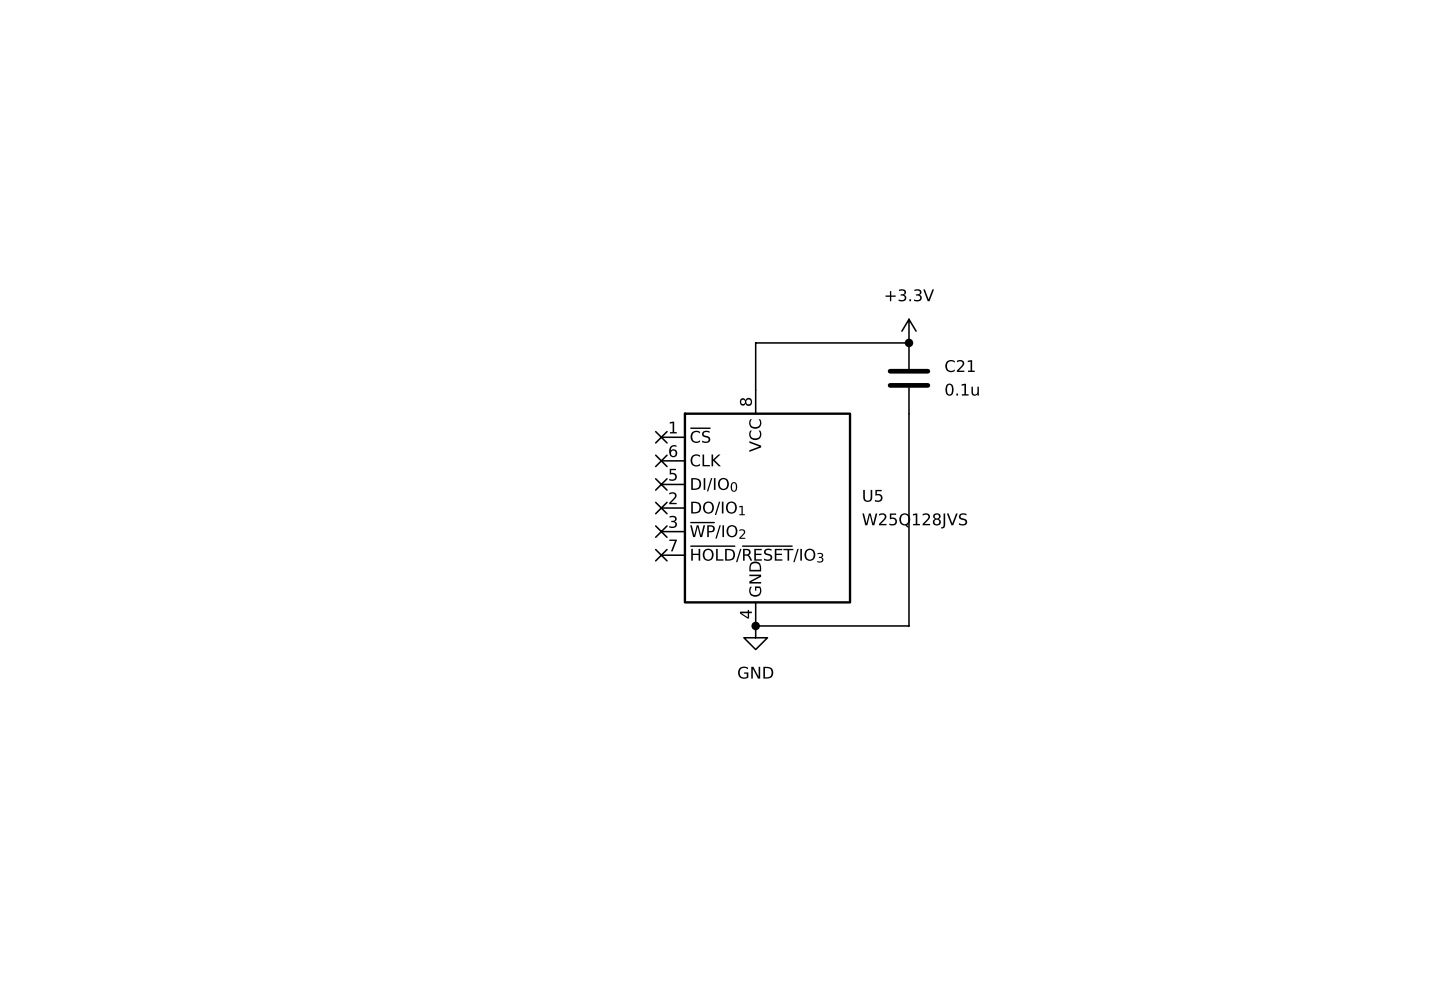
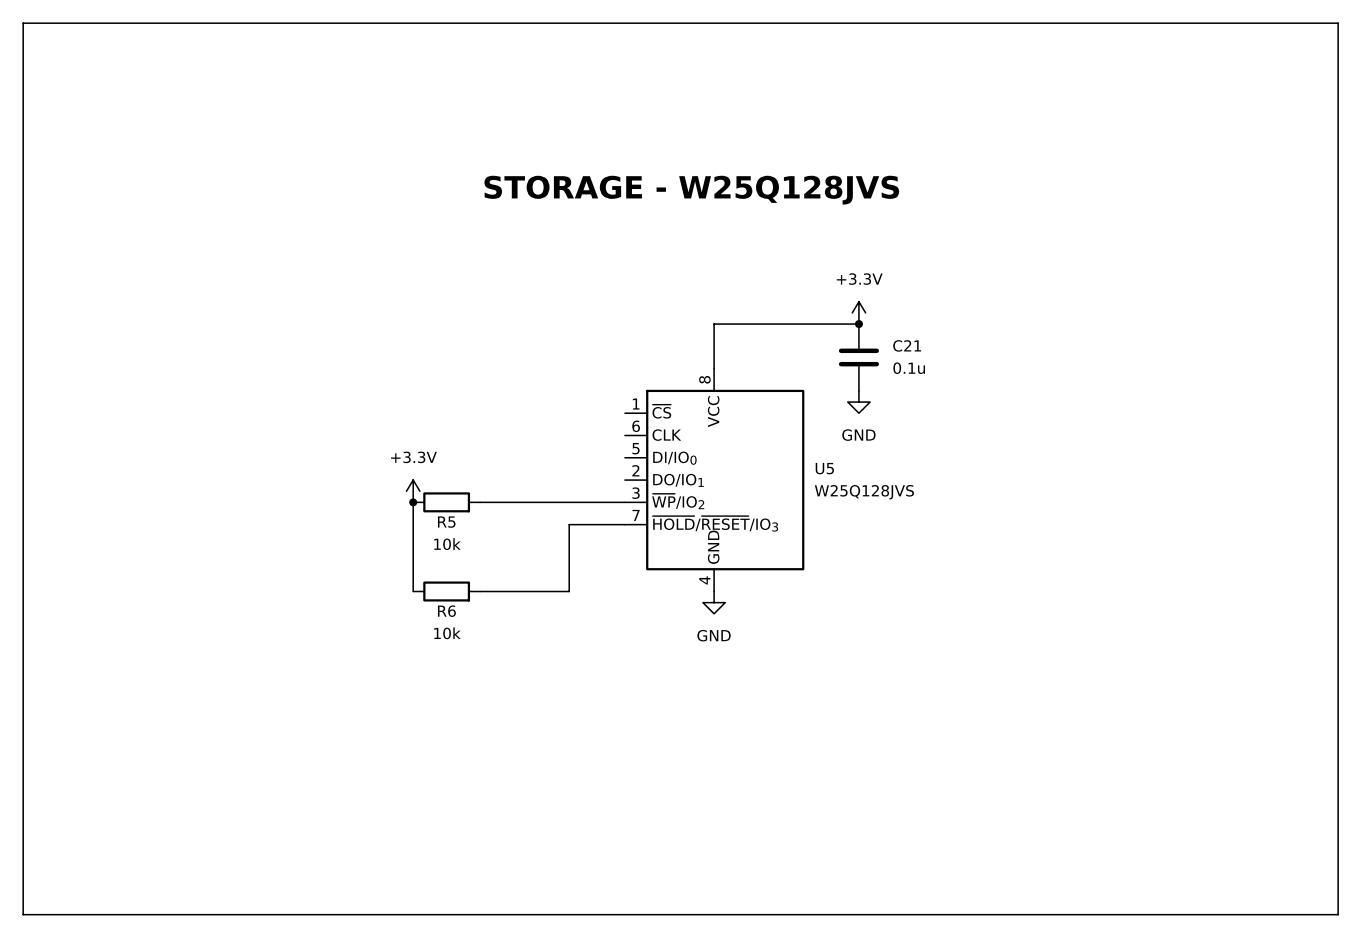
line: none -> (23, 23) (1338, 23) (1338, 914) (23, 914) (23, 23)
text: none -> STORAGE - W25Q128JVS (691, 190)
wire: (908, 413) (908, 625) (755, 625) -> none
power symbol: none -> GND (858, 402)
no-connect mark: (661, 437) -> none
no-connect mark: (661, 460) -> none
no-connect mark: (661, 484) -> none
no-connect mark: (661, 508) -> none
power symbol: none -> +3.3V (413, 491)
wire: none -> (413, 502) (413, 591)
junction: none -> (413, 502)
R5: none -> 10k (446, 502)
wire: none -> (480, 502) (624, 502)
no-connect mark: (661, 531) -> none
wire: none -> (624, 524) (569, 524) (569, 591) (480, 591)
no-connect mark: (661, 555) -> none
R6: none -> 10k (446, 591)
junction: (755, 625) -> none

